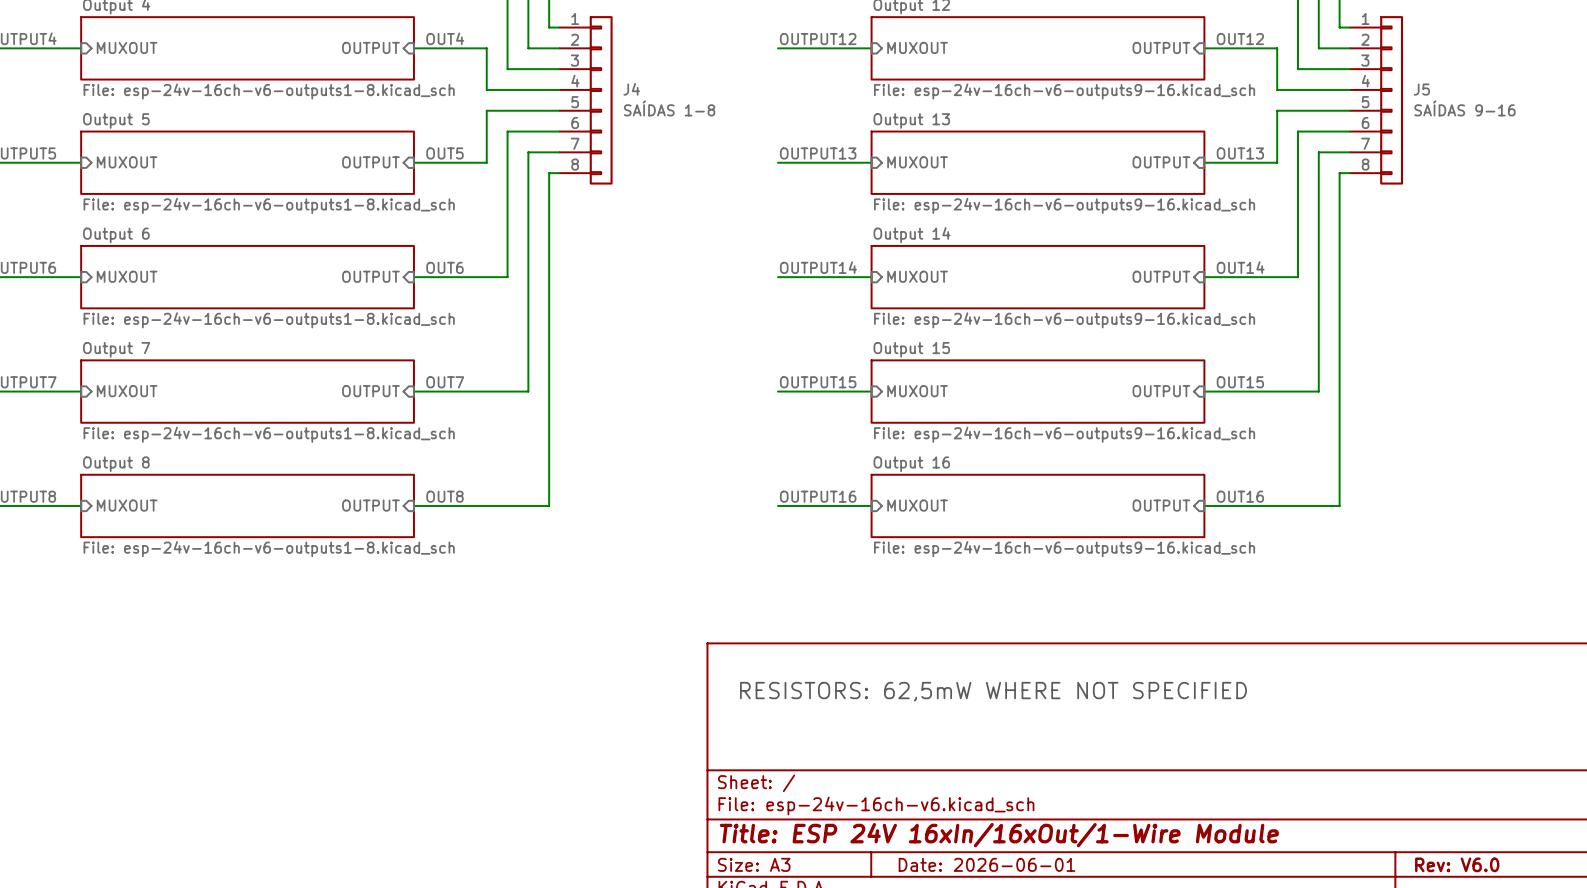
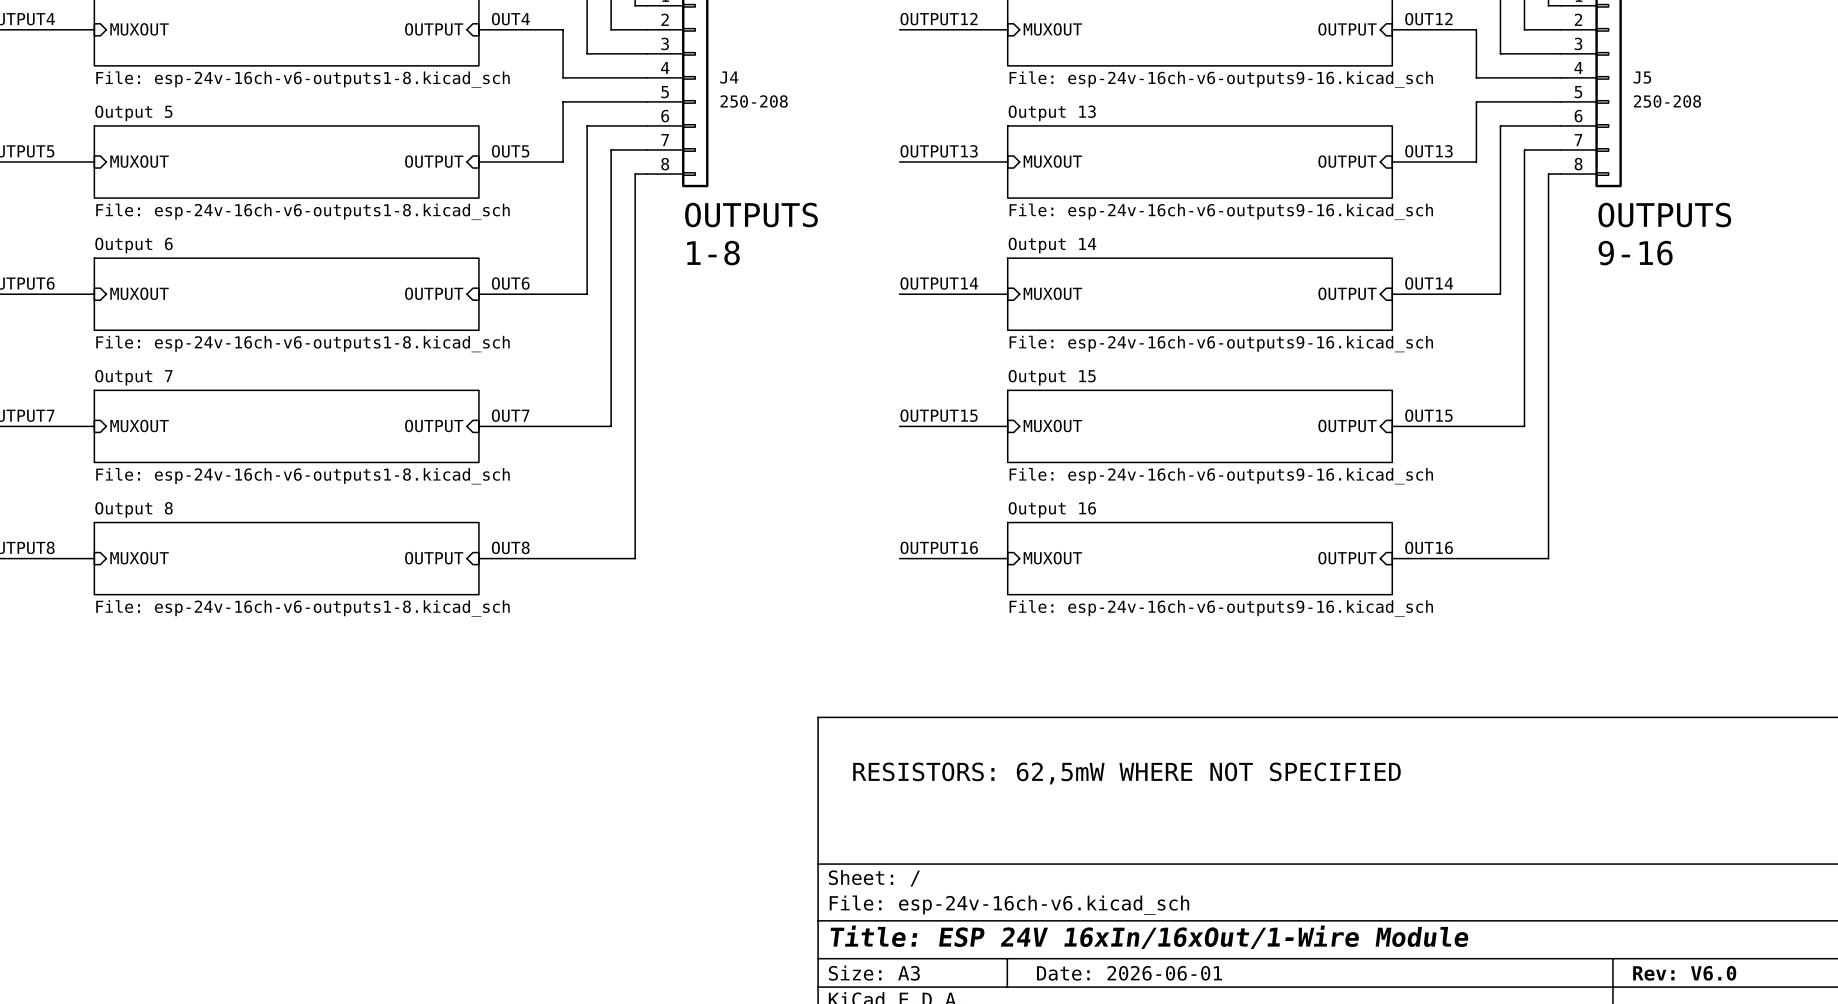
J4 value: SAÍDAS 1-8 (669, 108) -> 250-208 (754, 101)
J5 value: SAÍDAS 9-16 (1464, 108) -> 250-208 (1667, 101)
text: none -> OUTPUTS (751, 215)
text: none -> OUTPUTS (1664, 215)
text: none -> 1-8 (713, 253)
text: none -> 9-16 (1635, 253)

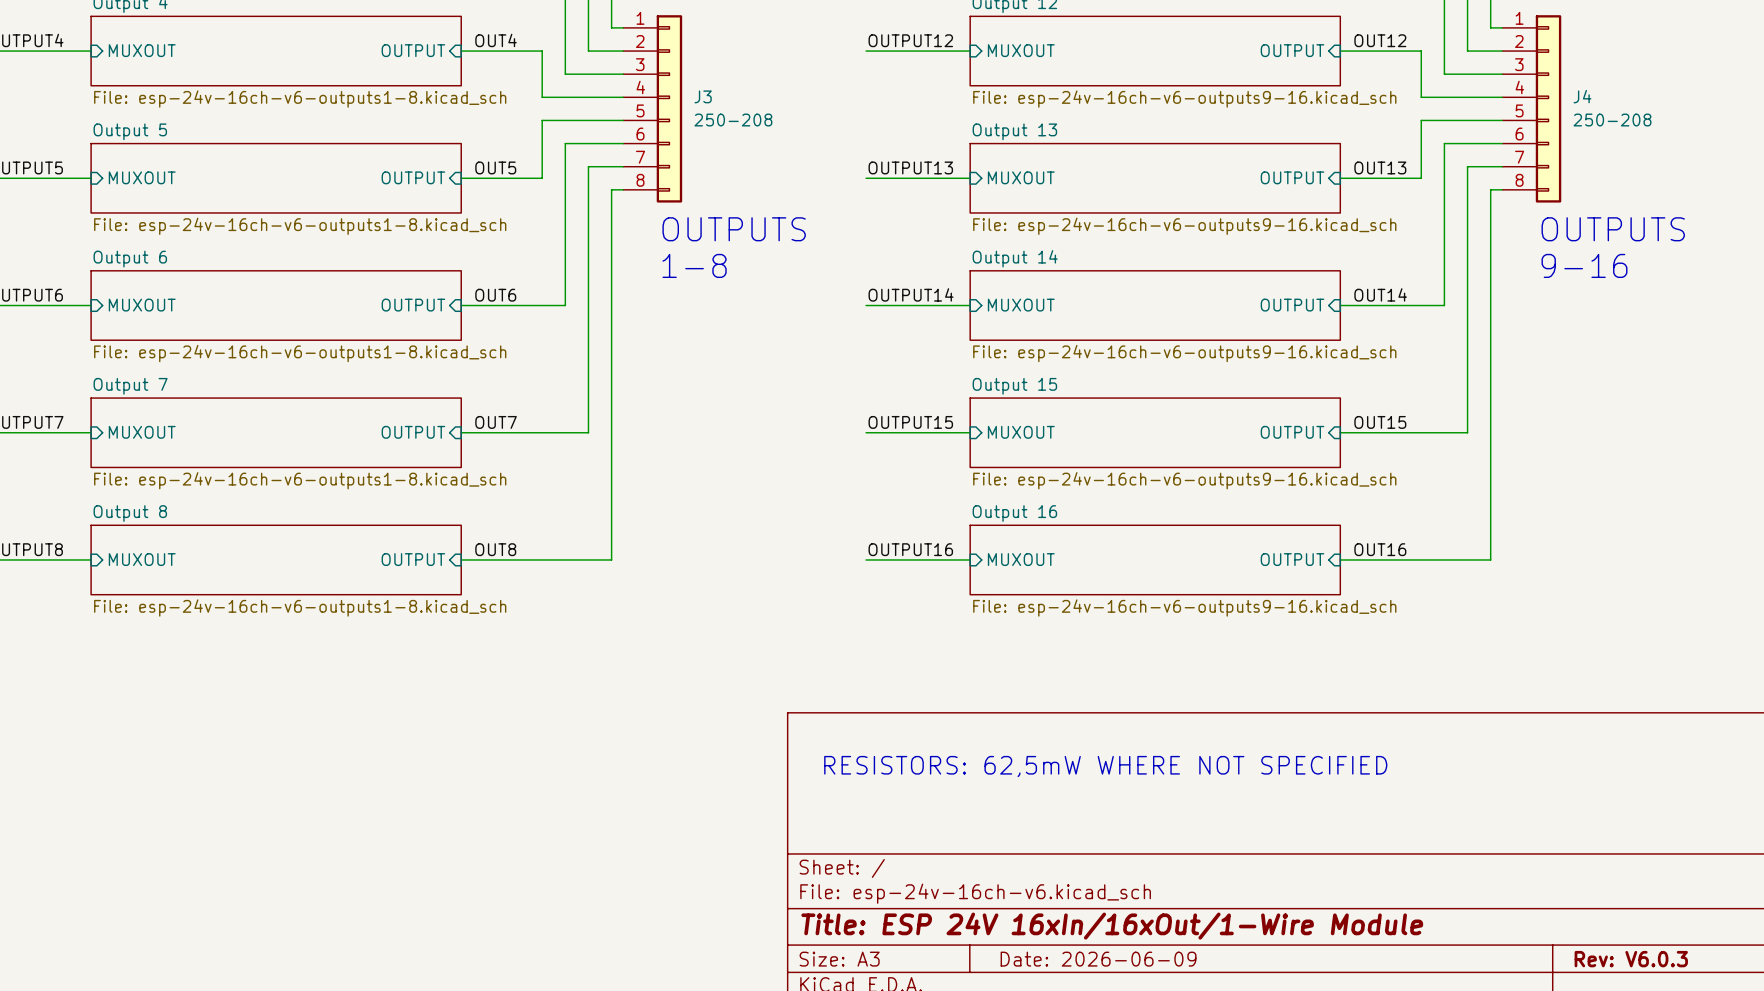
J4 name: J4 (729, 77) -> J3 (703, 96)
J5 name: J5 (1642, 77) -> J4 (1582, 96)
title block: Date: 2026-06-01 (1129, 973) -> Date: 2026-06-09 (1098, 959)
title block: Rev: V6.0 (1684, 973) -> Rev: V6.0.3 (1631, 959)

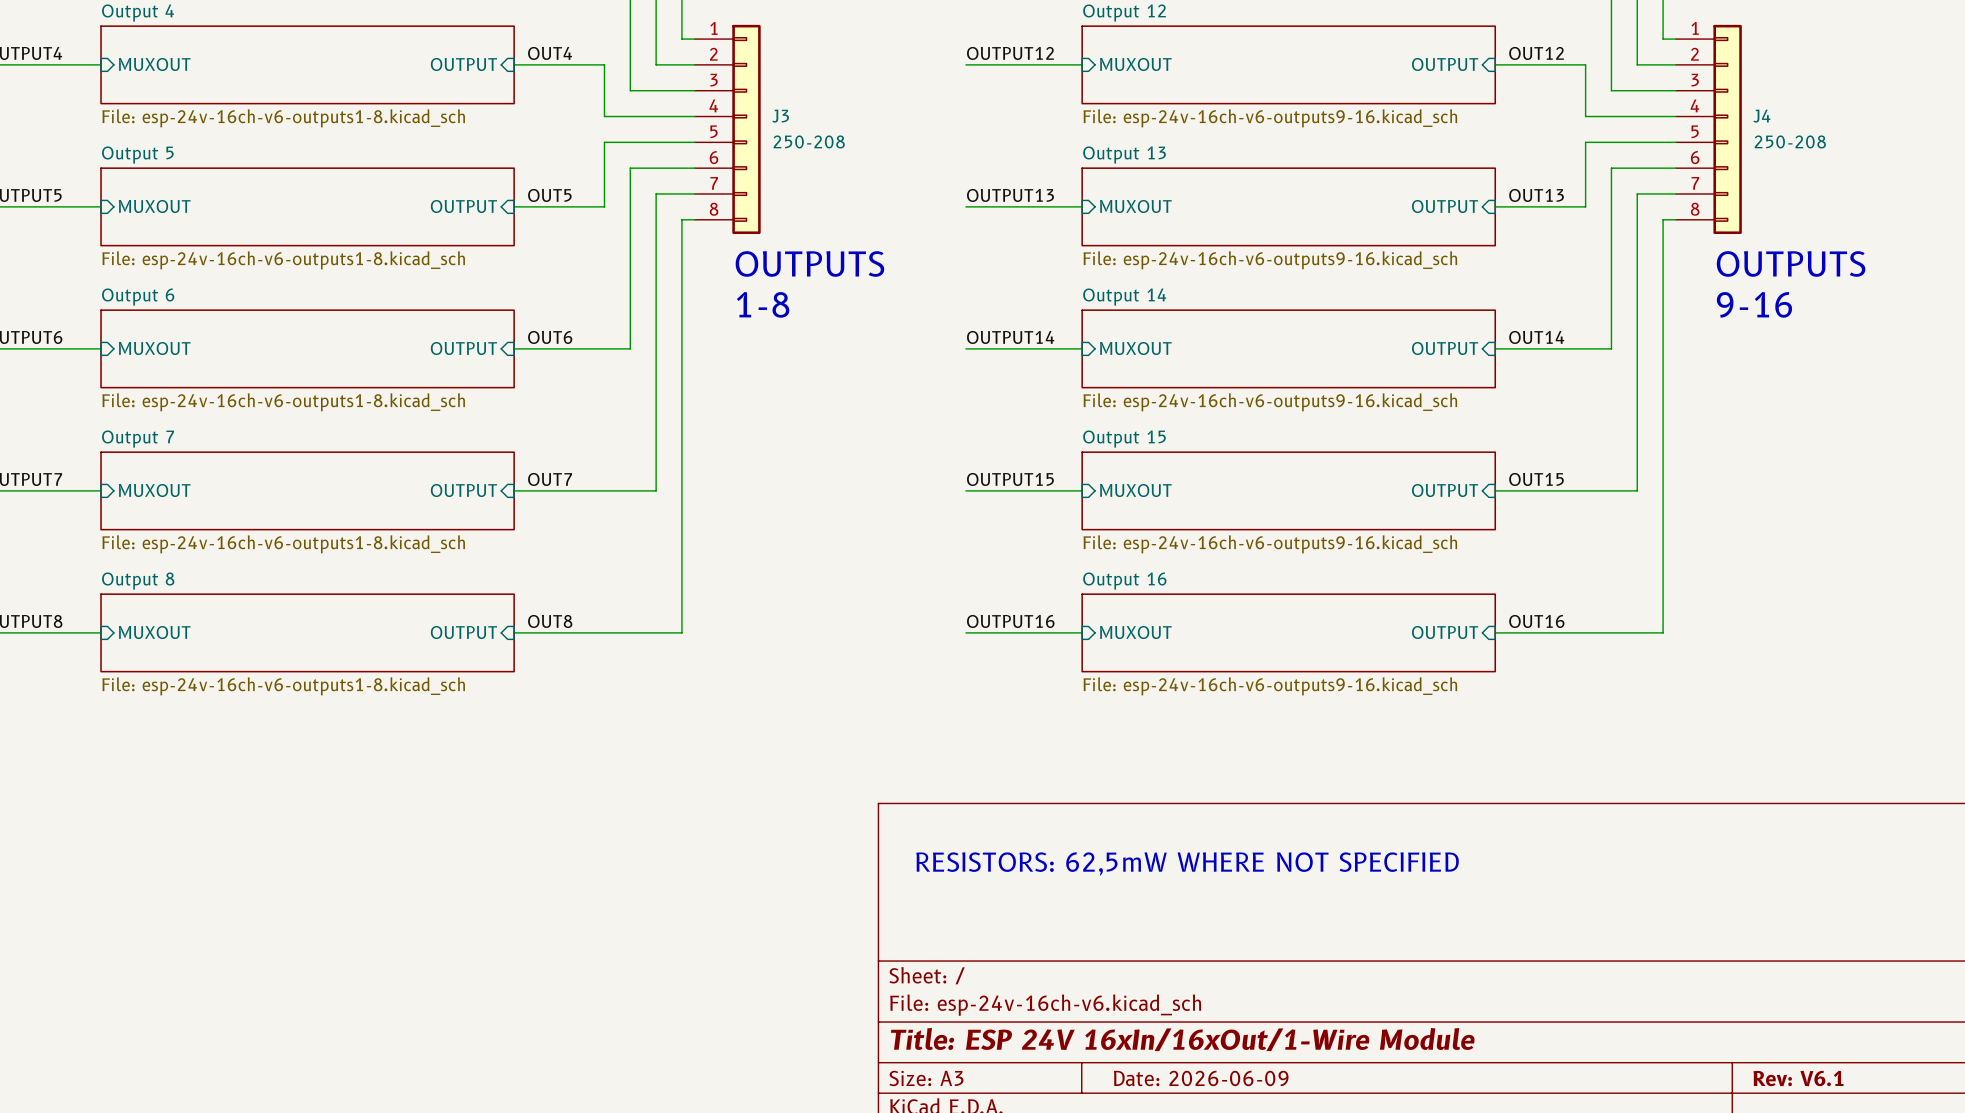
title block: Rev: V6.0.3 (1631, 959) -> Rev: V6.1 (1798, 1078)

